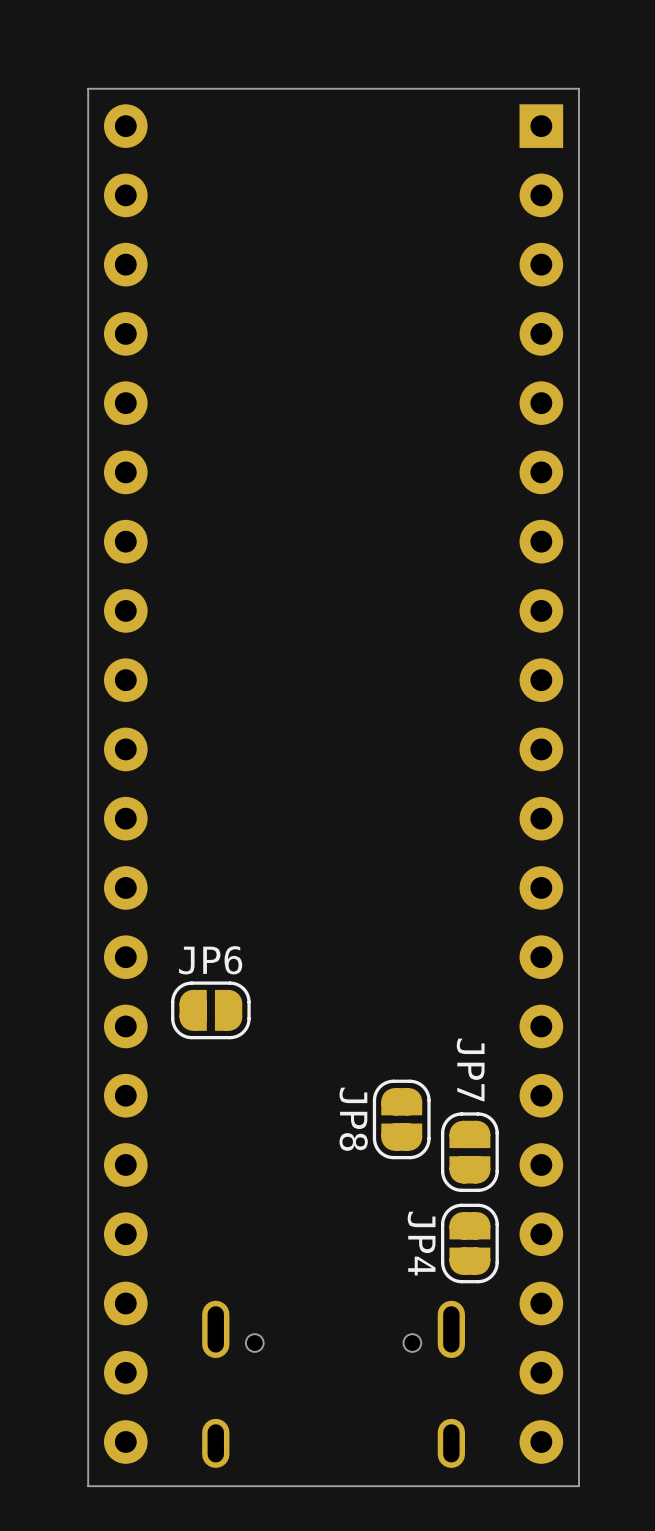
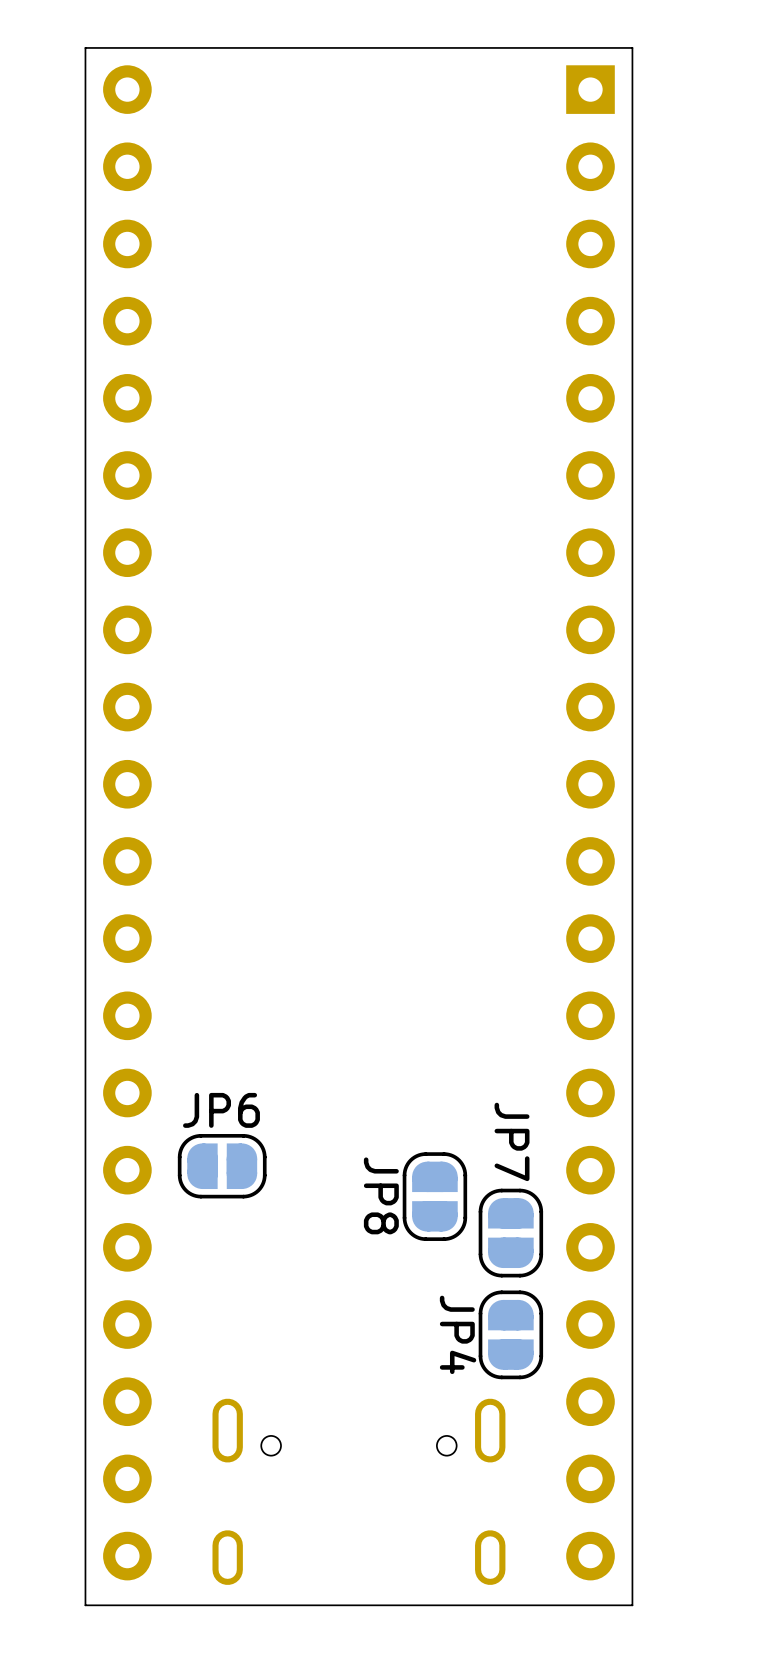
JP6 position: (210, 1010) -> (222, 1166)

